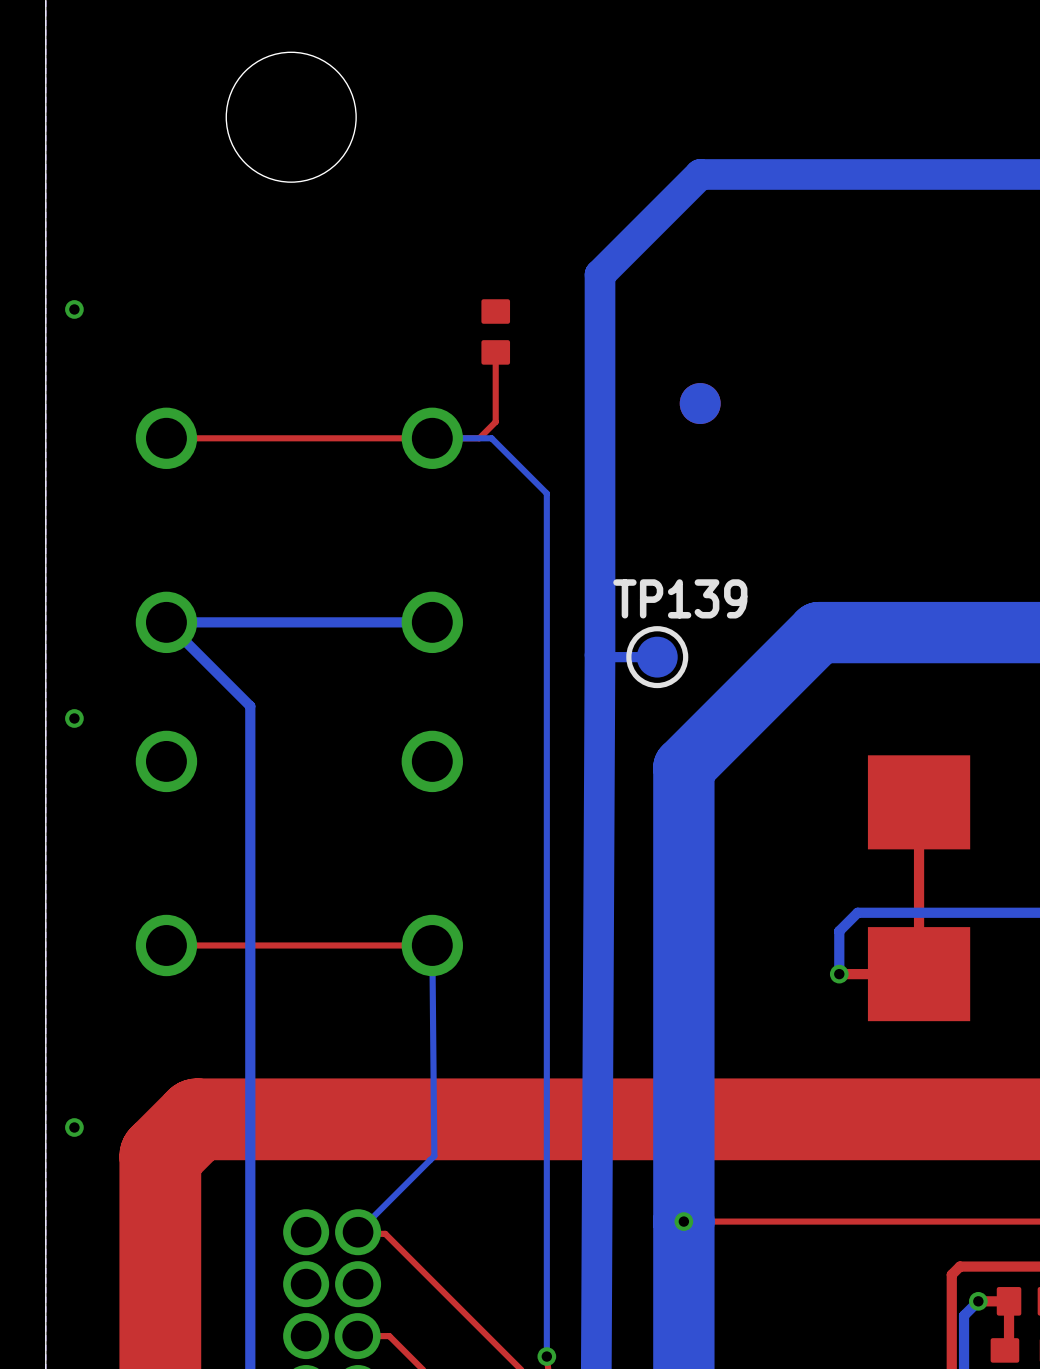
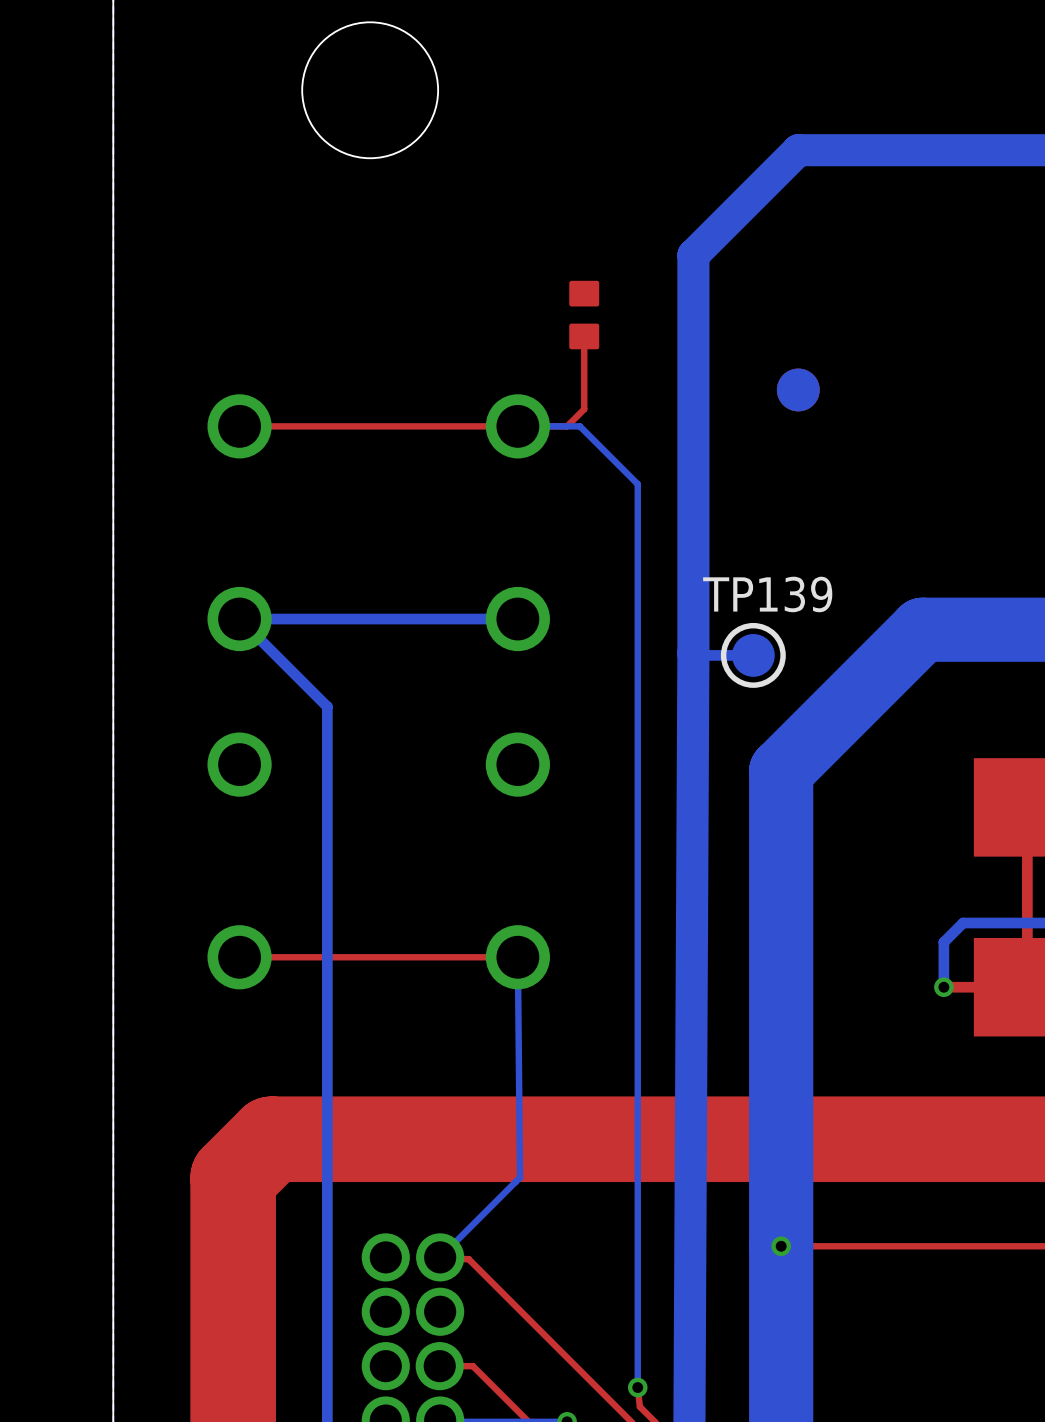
via: (74, 309) -> none
via: (74, 718) -> none
via: (74, 1127) -> none

